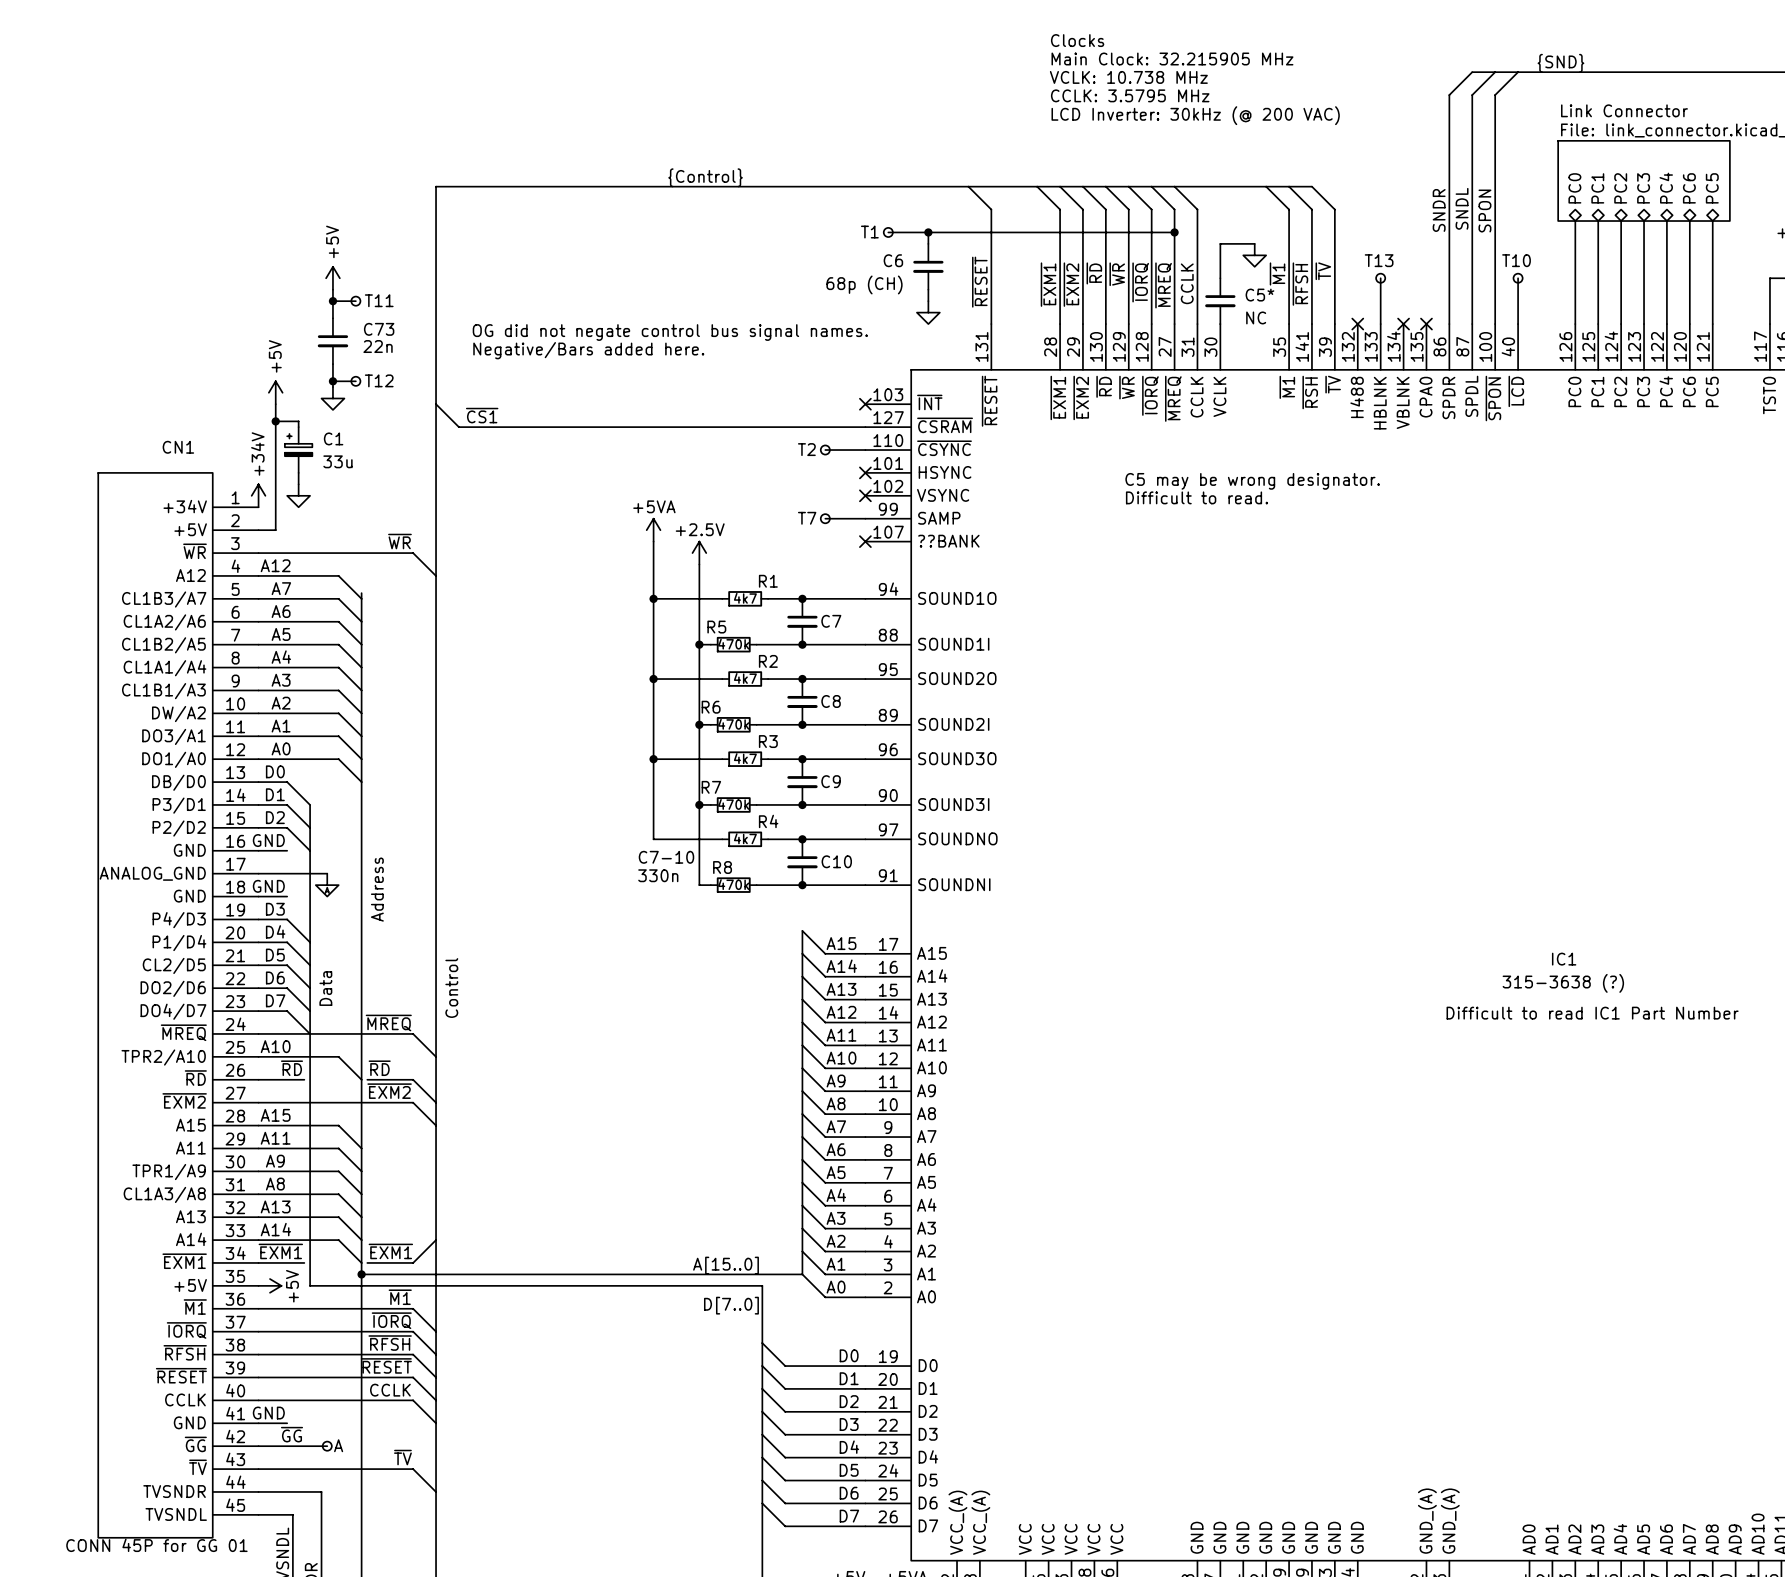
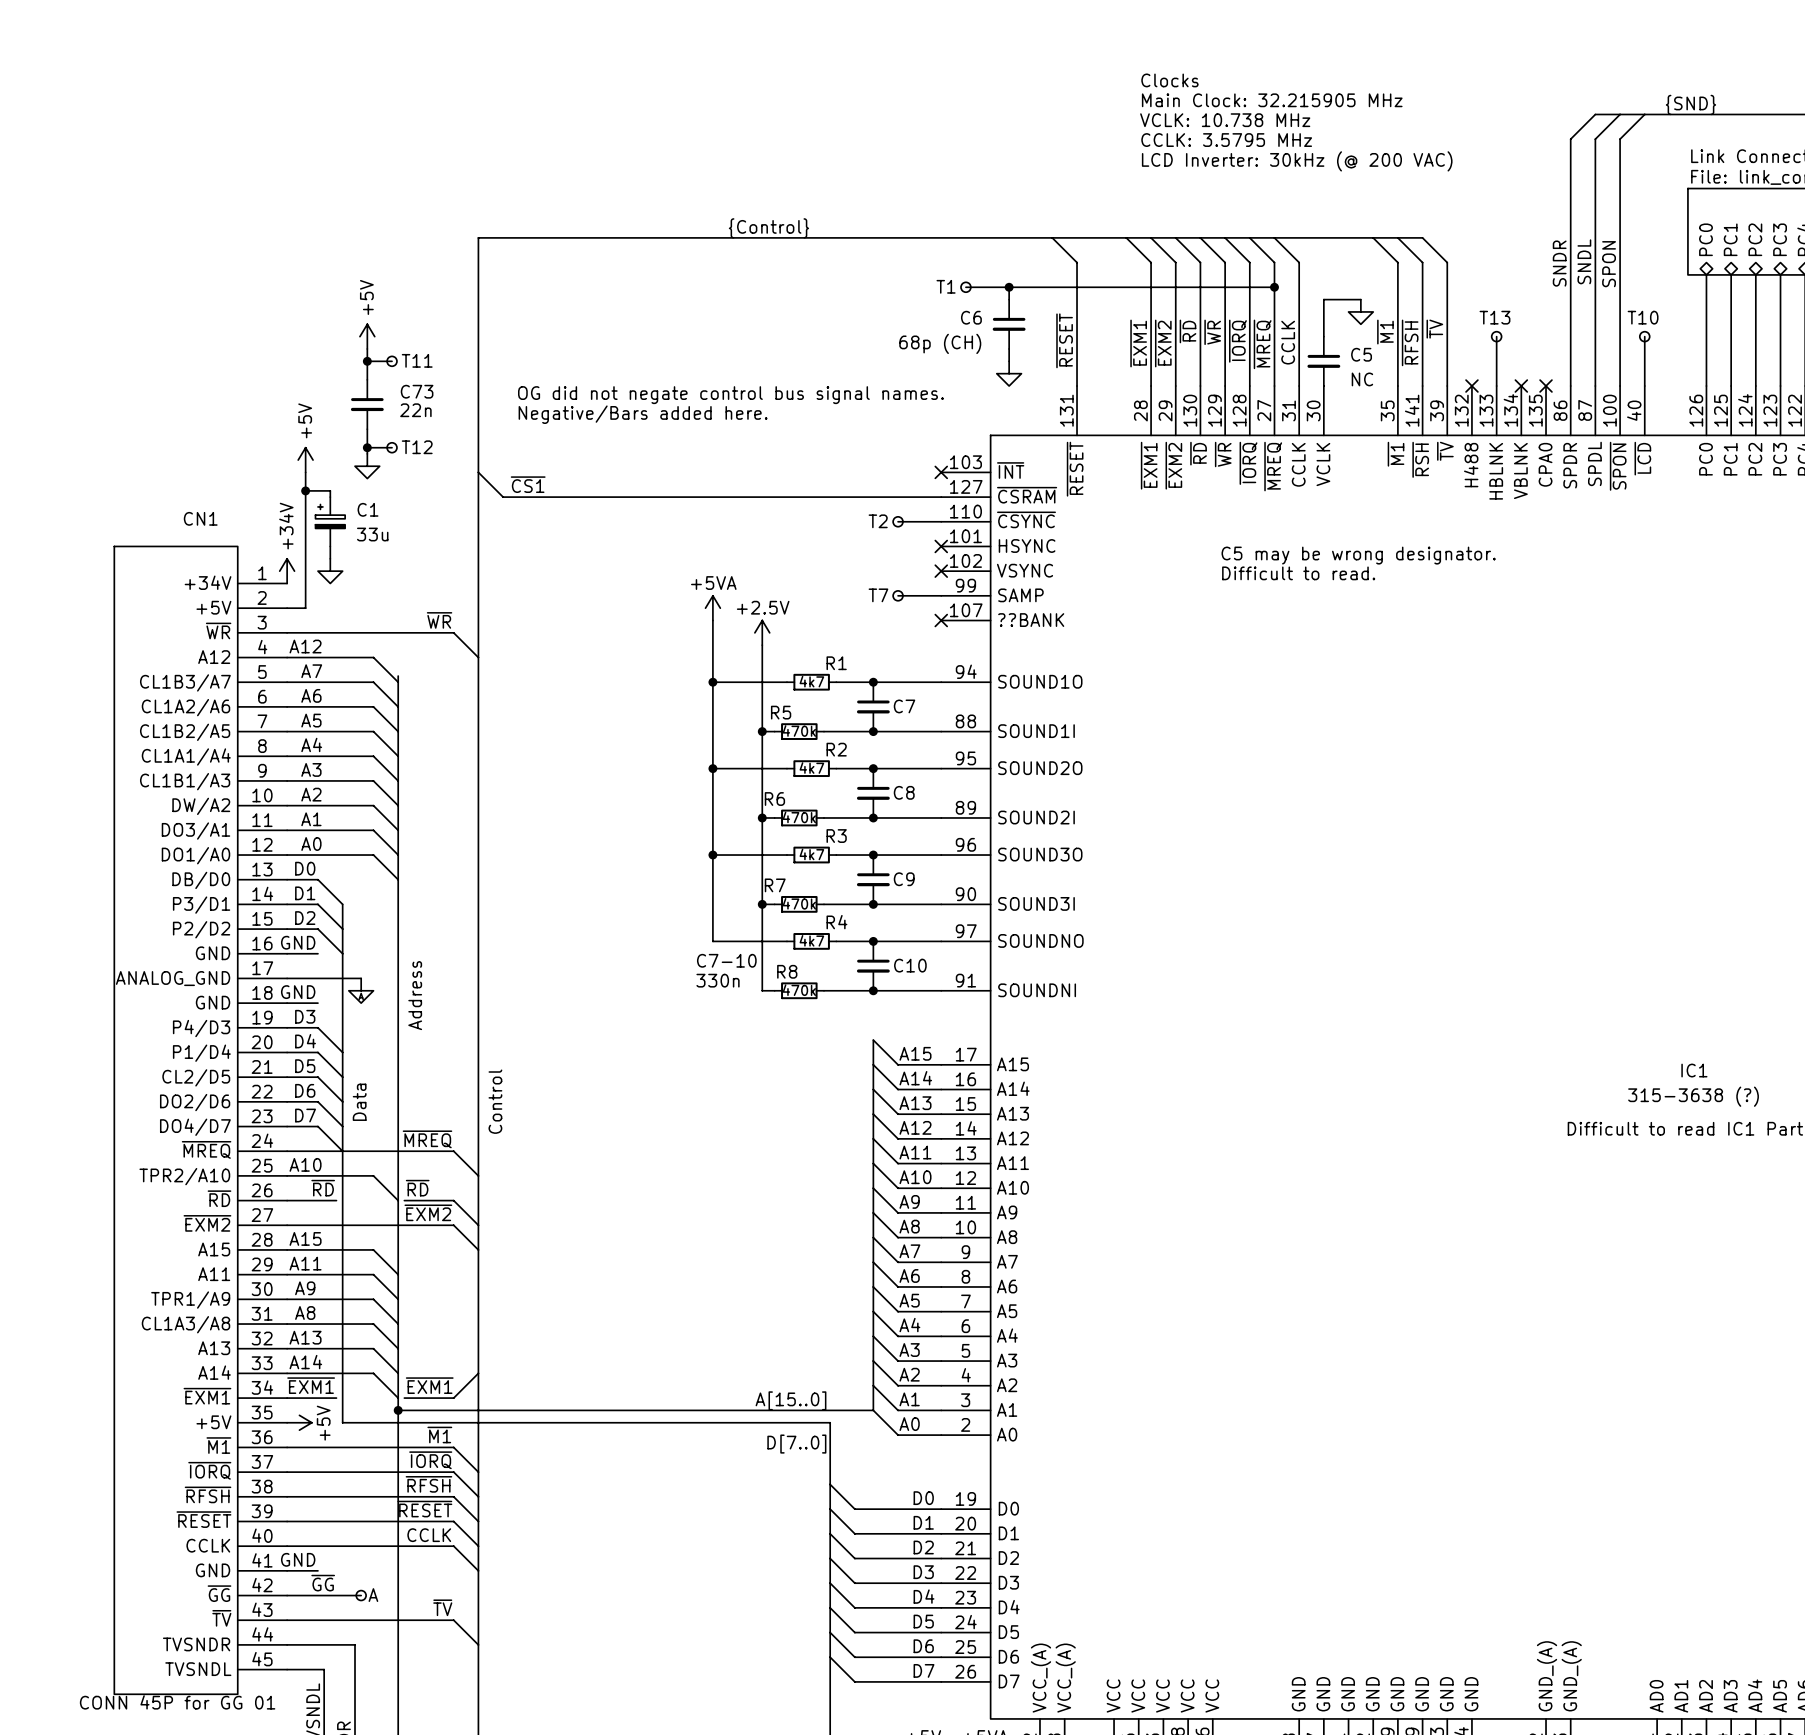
C5* name: C5* (1259, 295) -> C5 (1361, 354)

